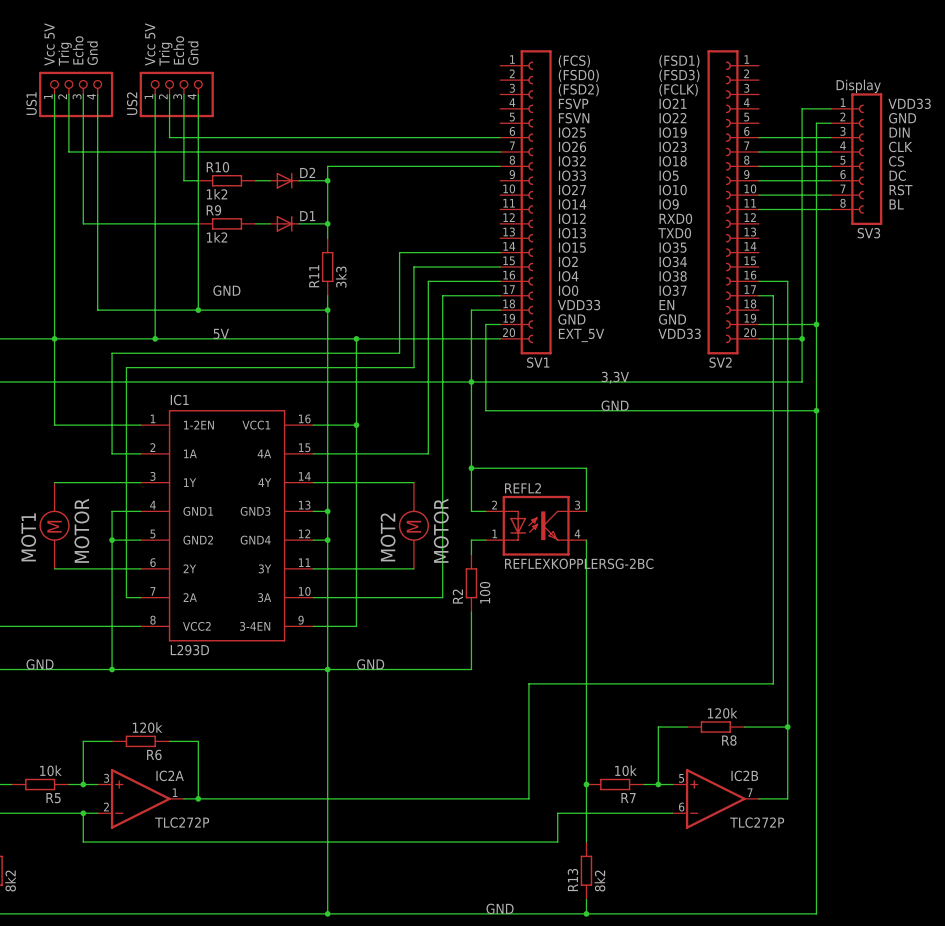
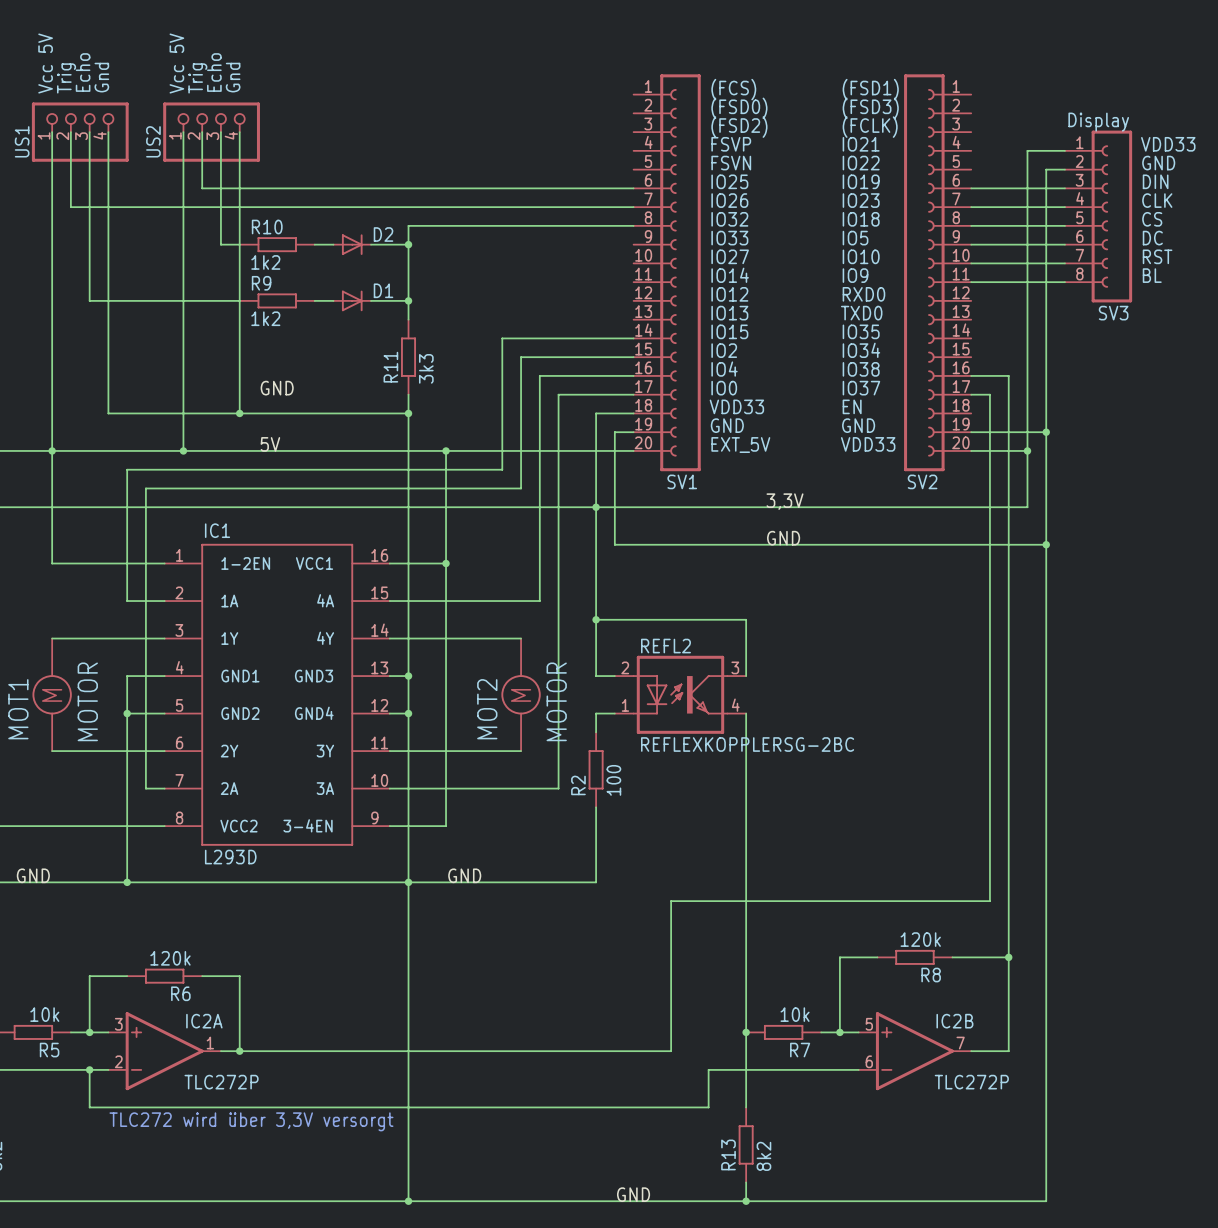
text: none -> TLC272 wird über 3,3V versorgt (251, 1121)

